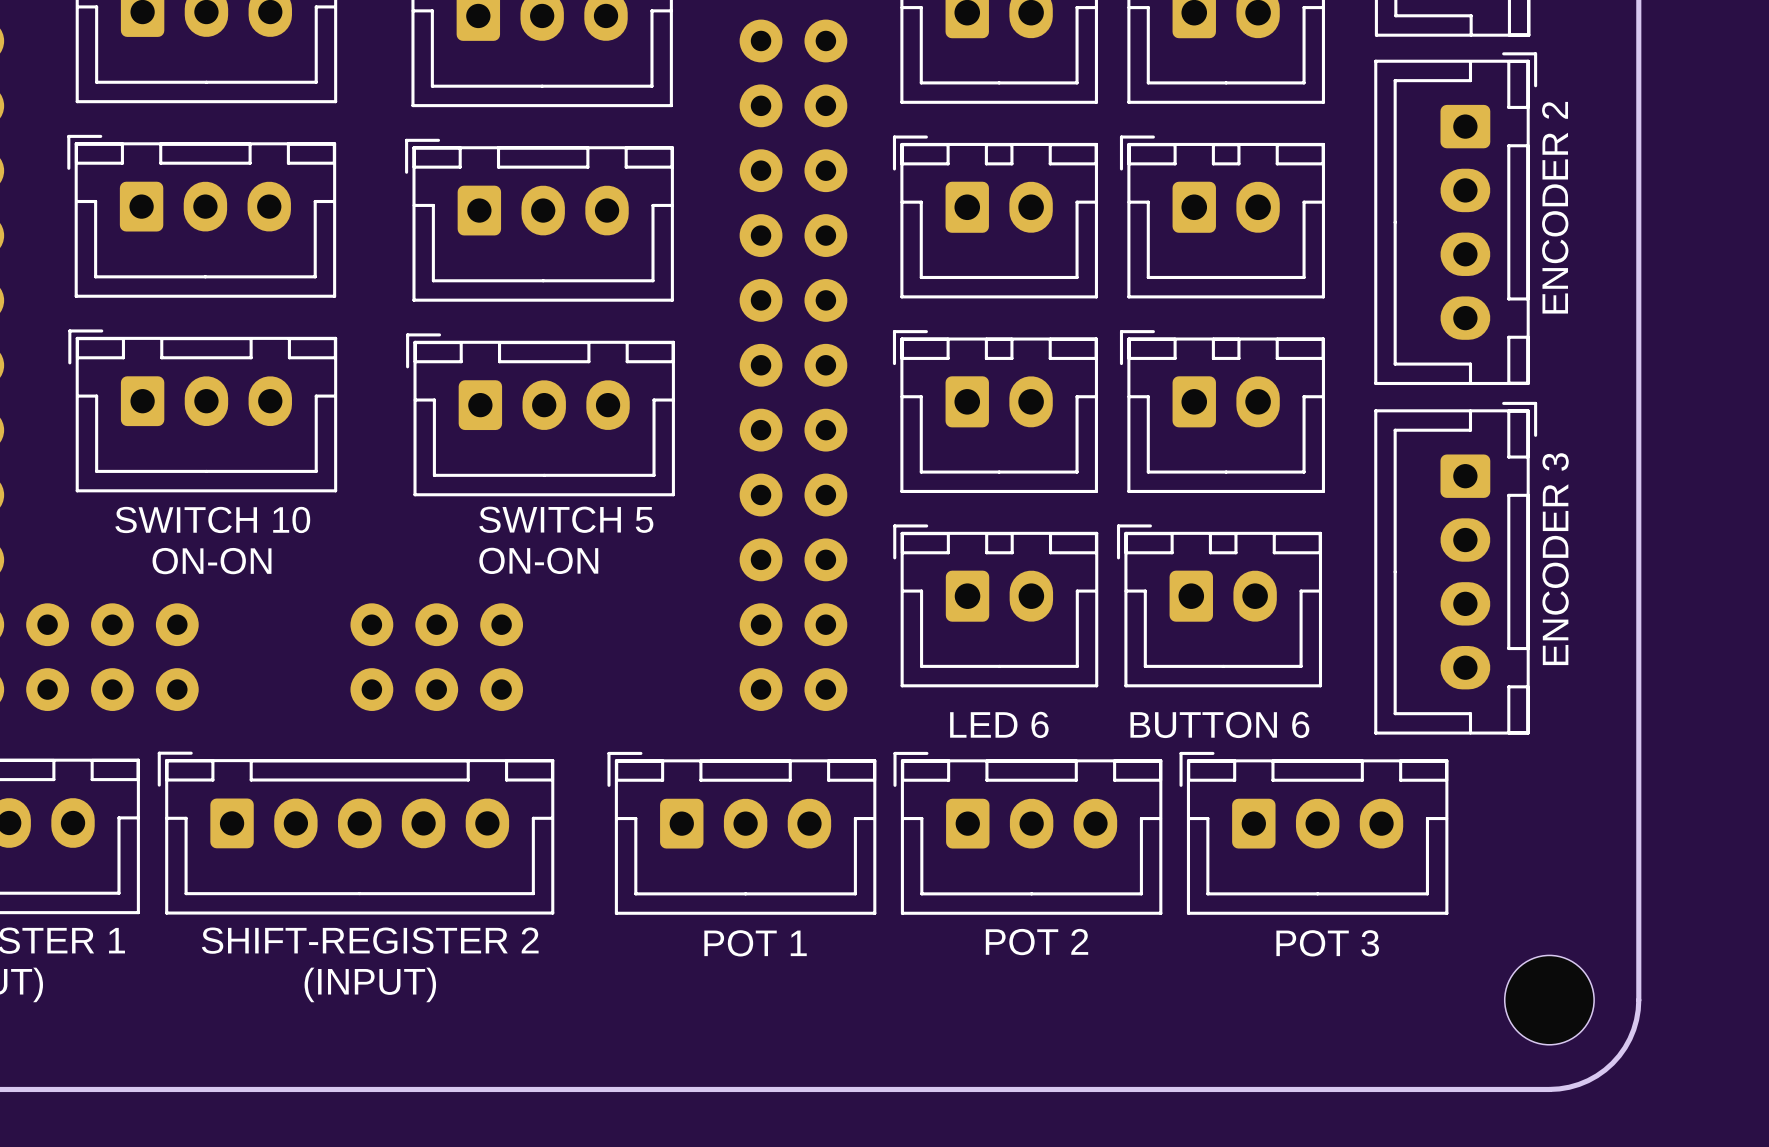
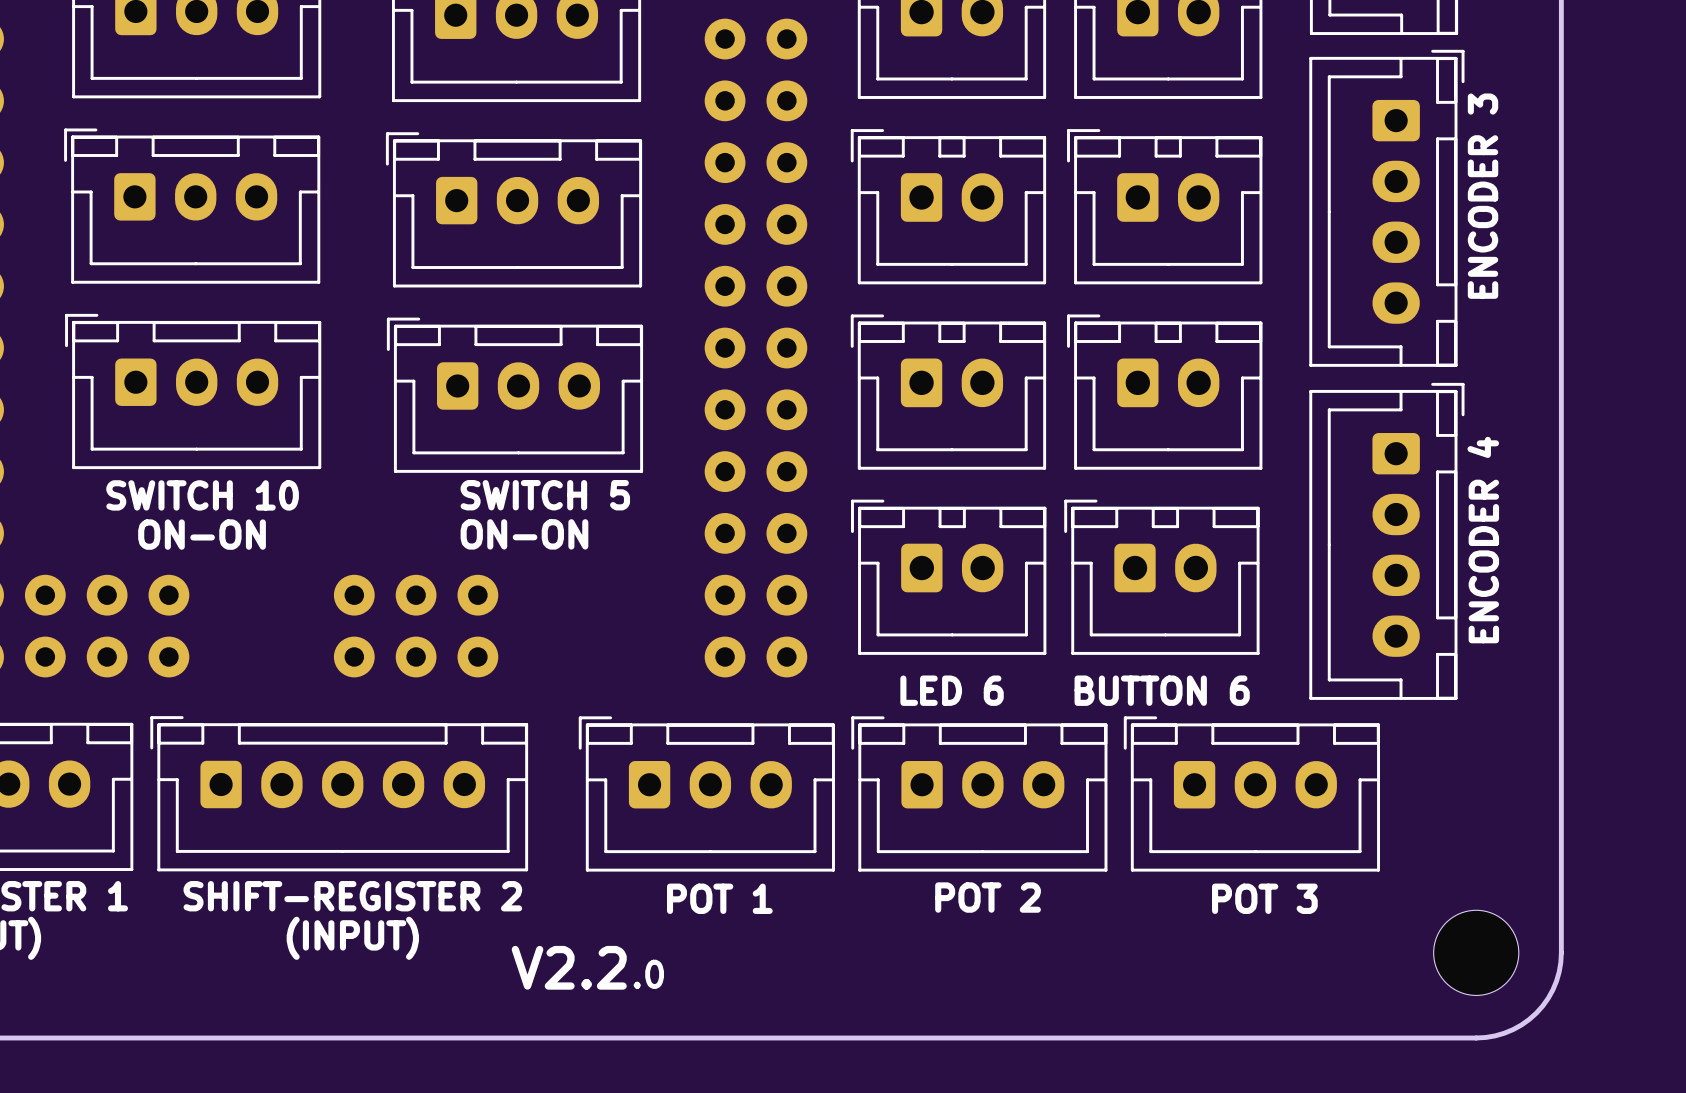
text: ENCODER 2 (1555, 207) -> ENCODER 3 (1483, 196)
text: ENCODER 3 (1555, 559) -> ENCODER 4 (1483, 540)
text: none -> V2.2 (569, 967)
text: none -> .0 (648, 974)

